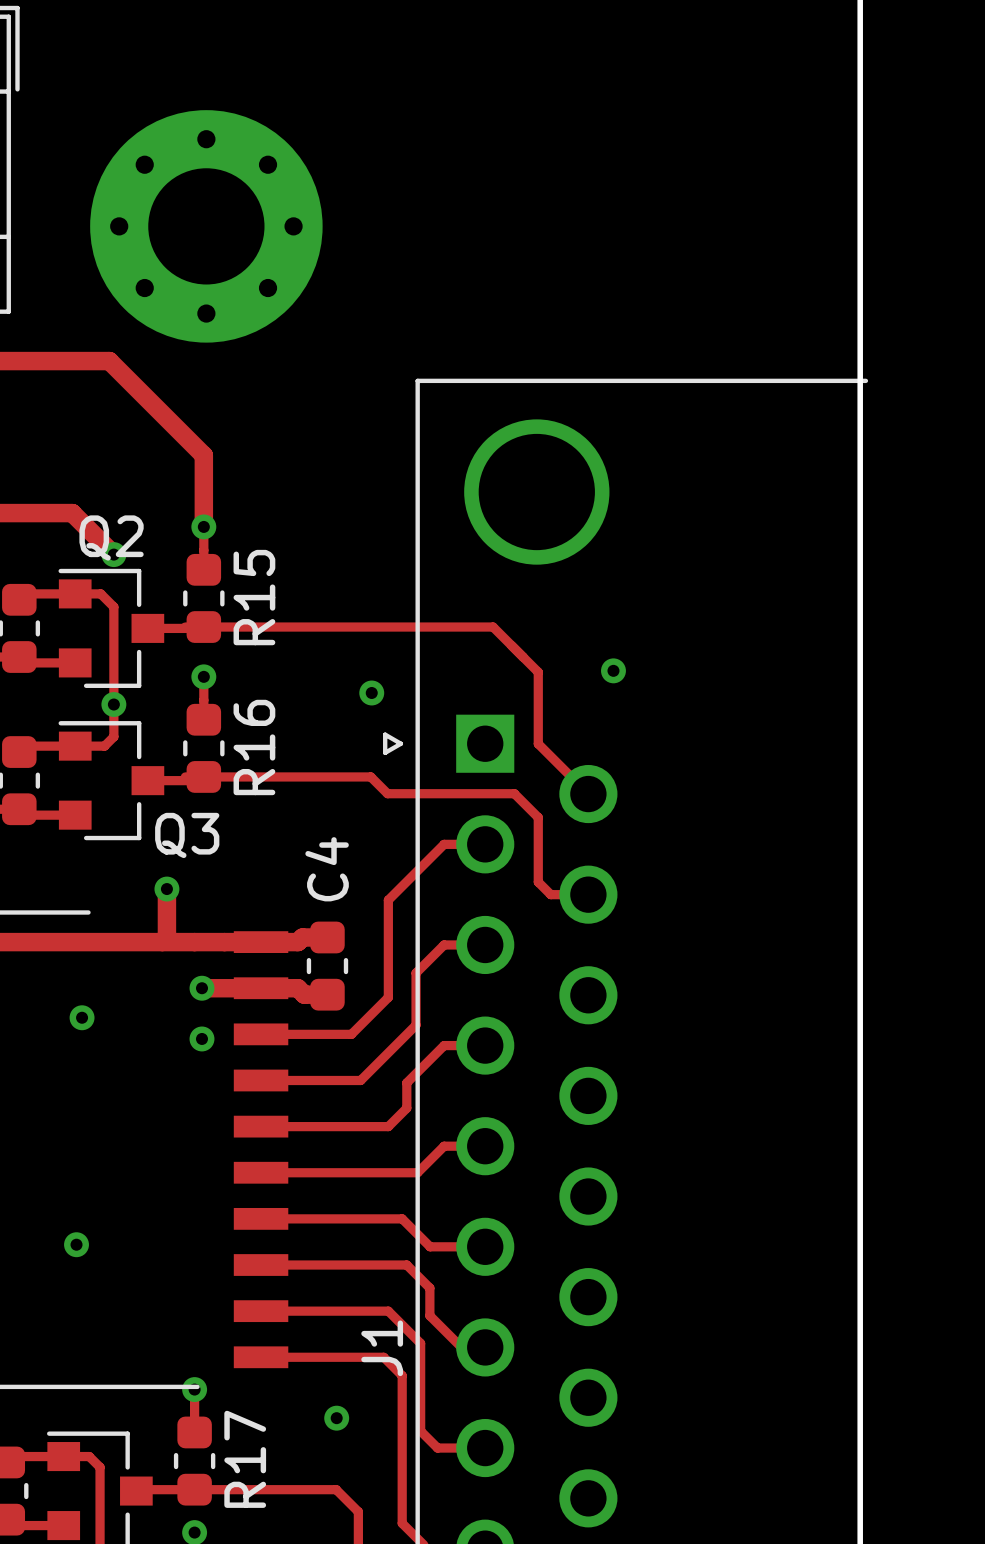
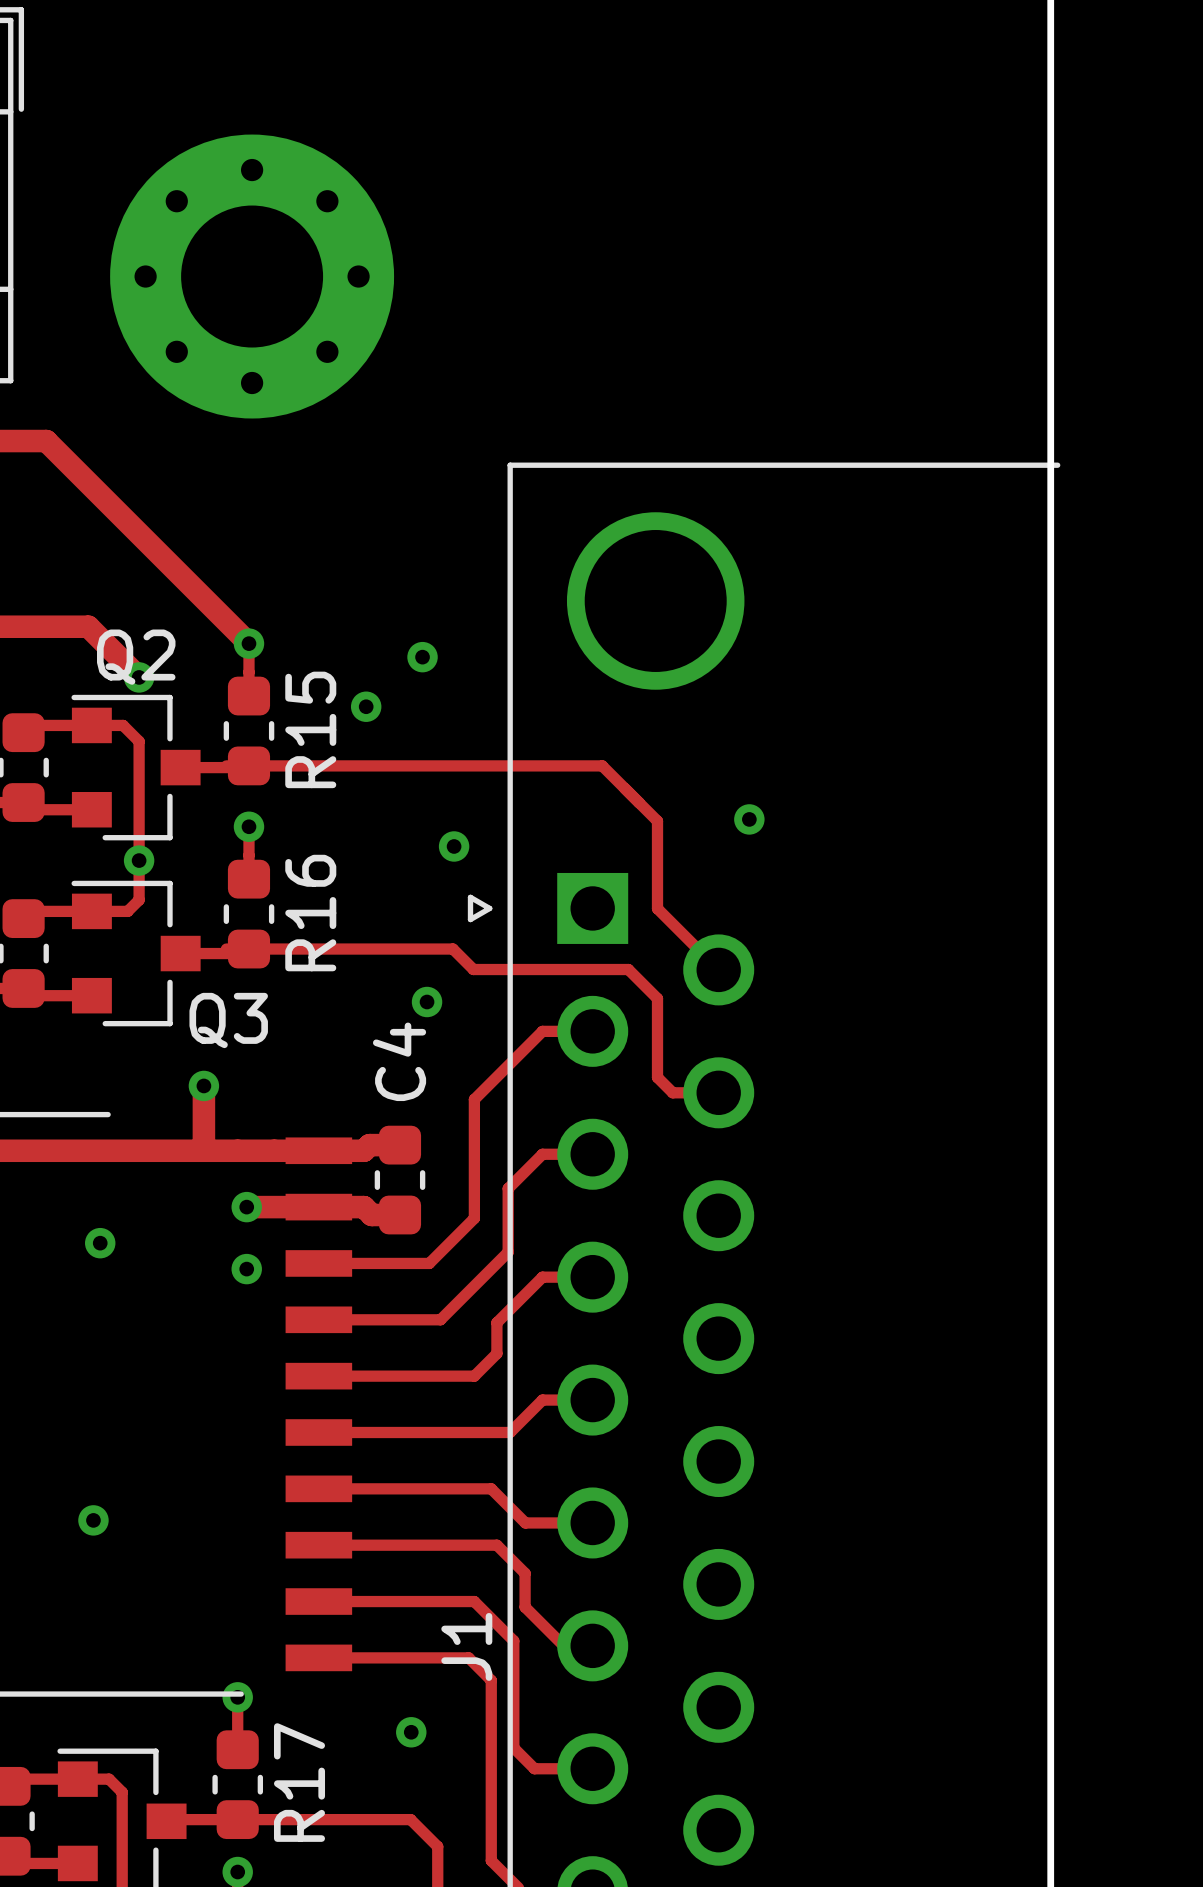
track: (37, 361) (109, 361) (203, 455) (203, 526) -> (46, 441) (248, 643)
via: none -> (422, 657)
via: none -> (366, 706)
via: none -> (427, 1002)

